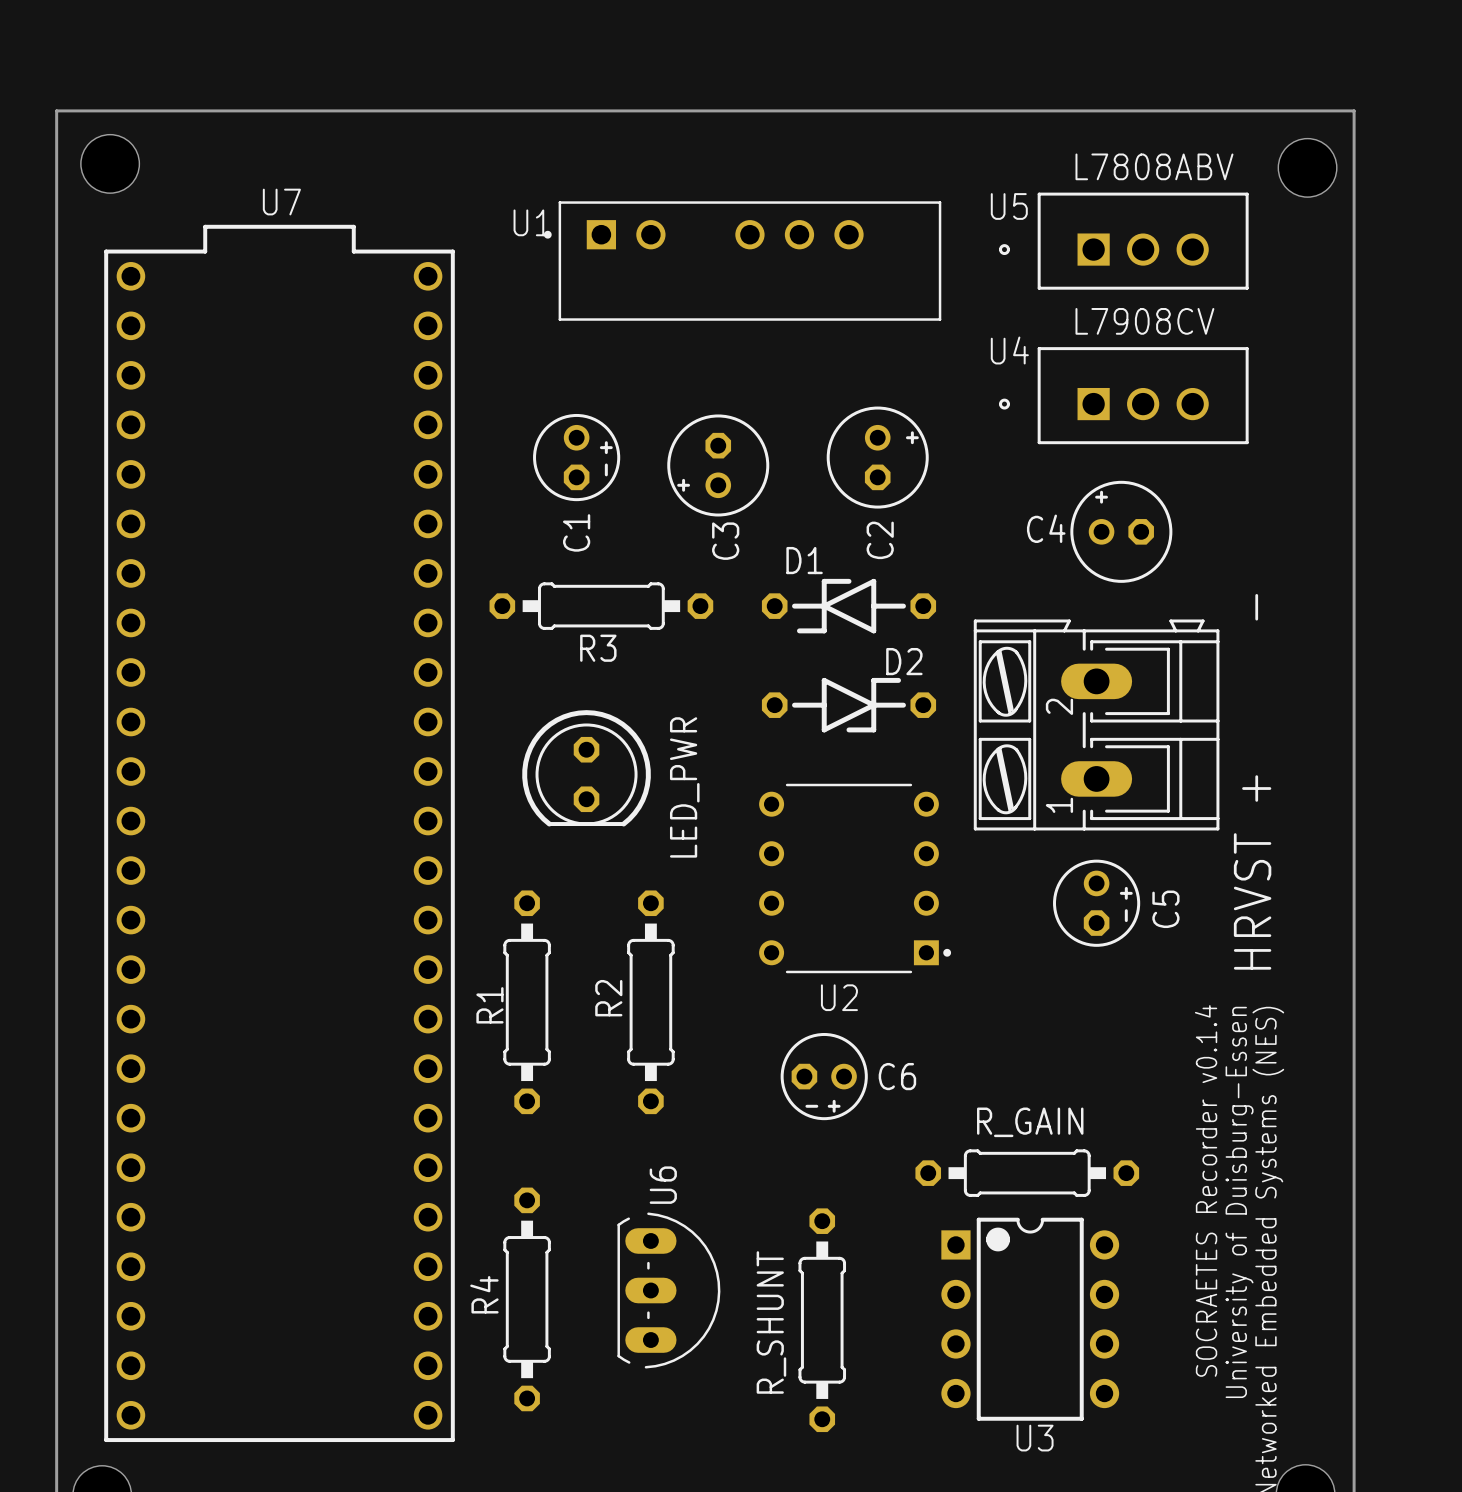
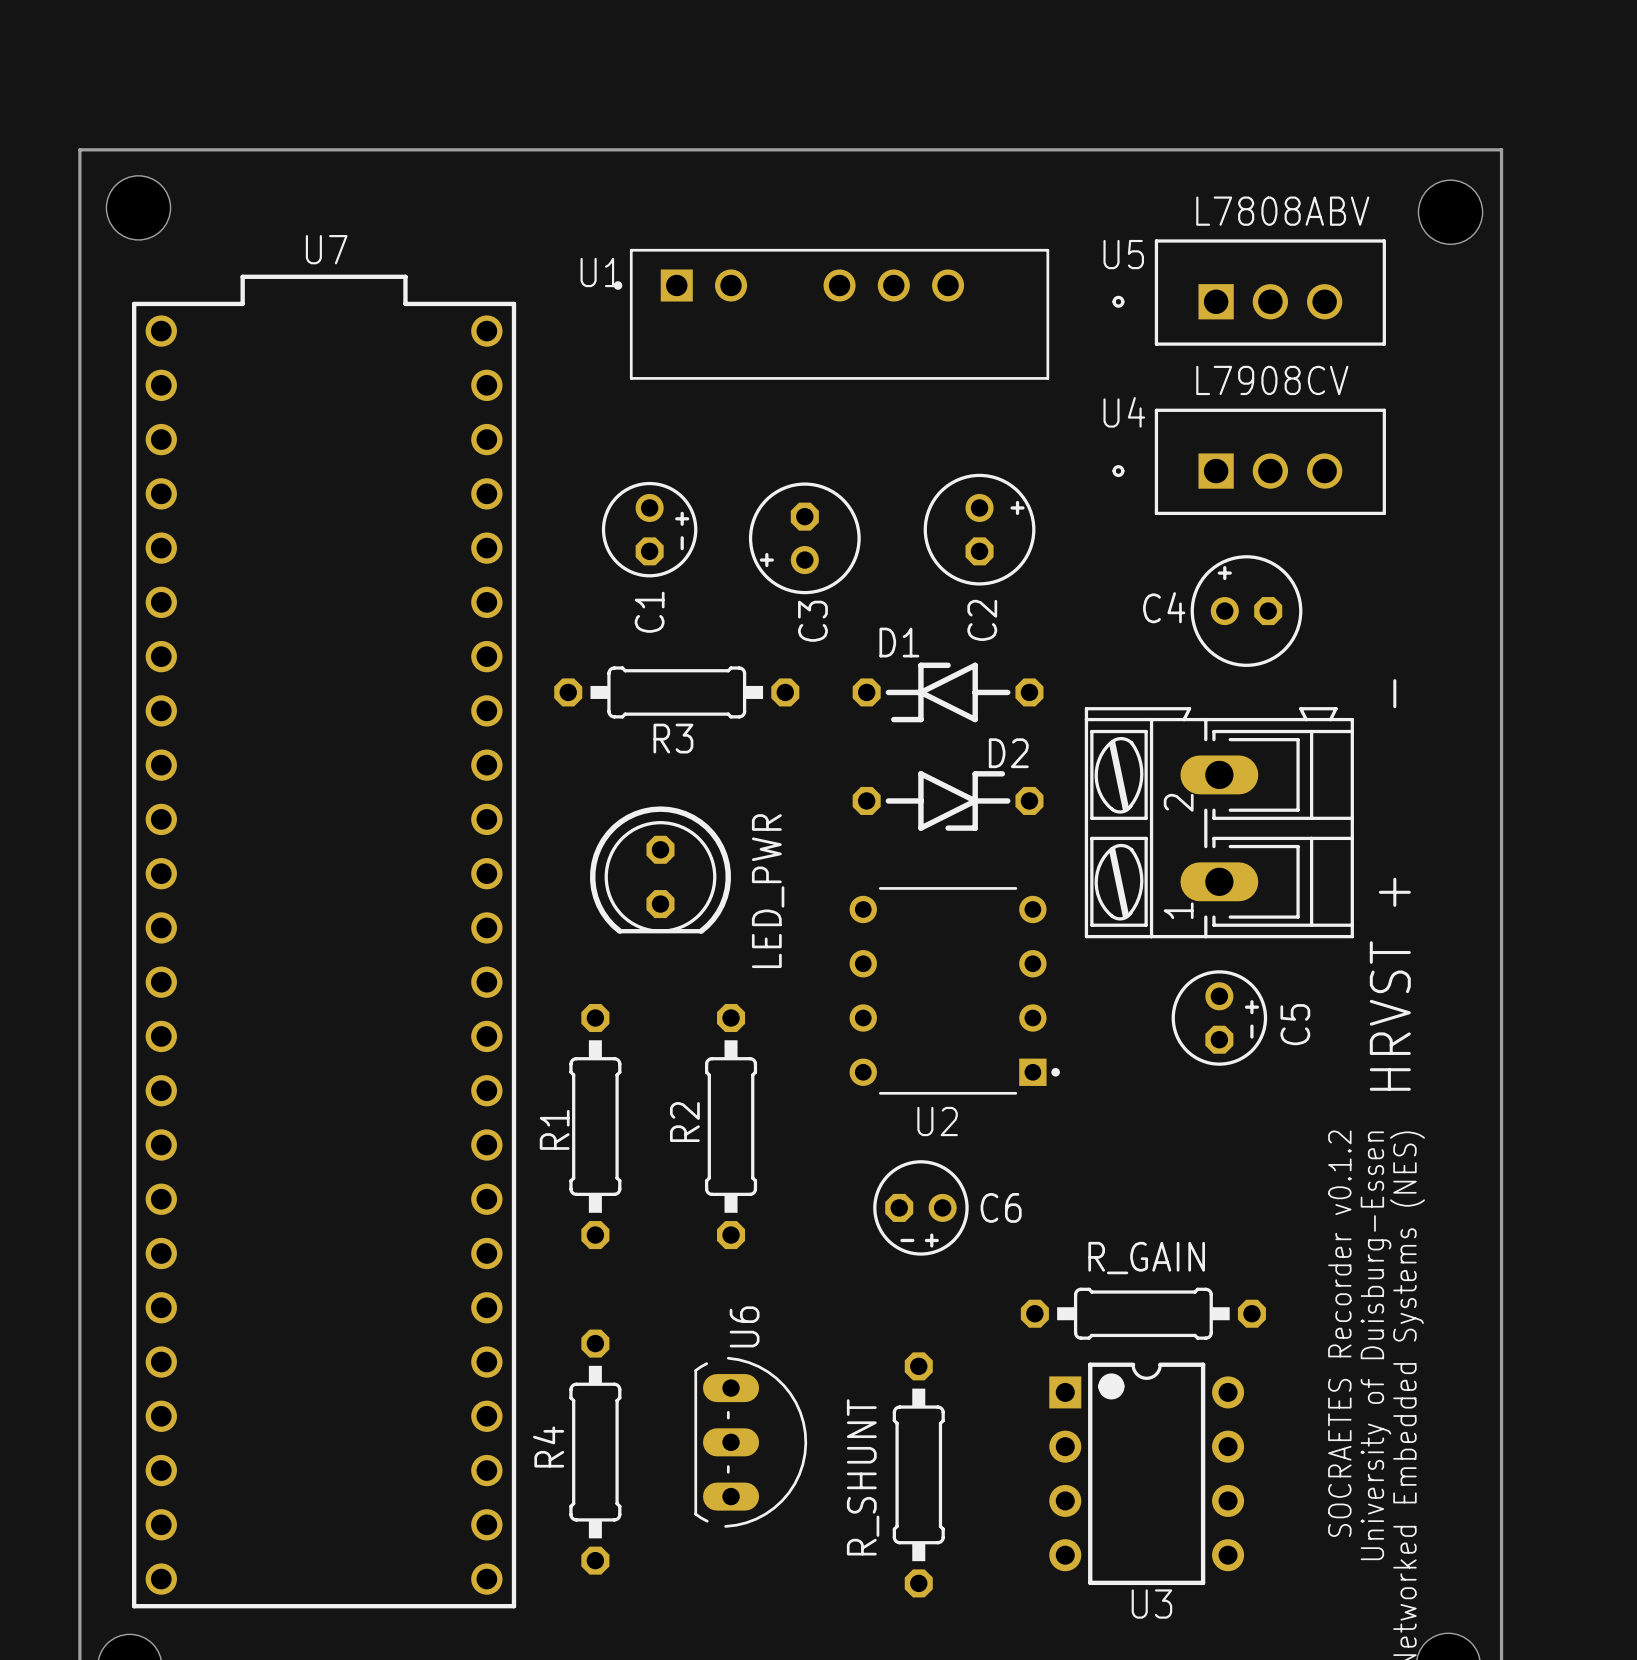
text: SOCRAETES Recorder v0.1.4 (1206, 1190) -> SOCRAETES Recorder v0.1.2 (1339, 1333)

